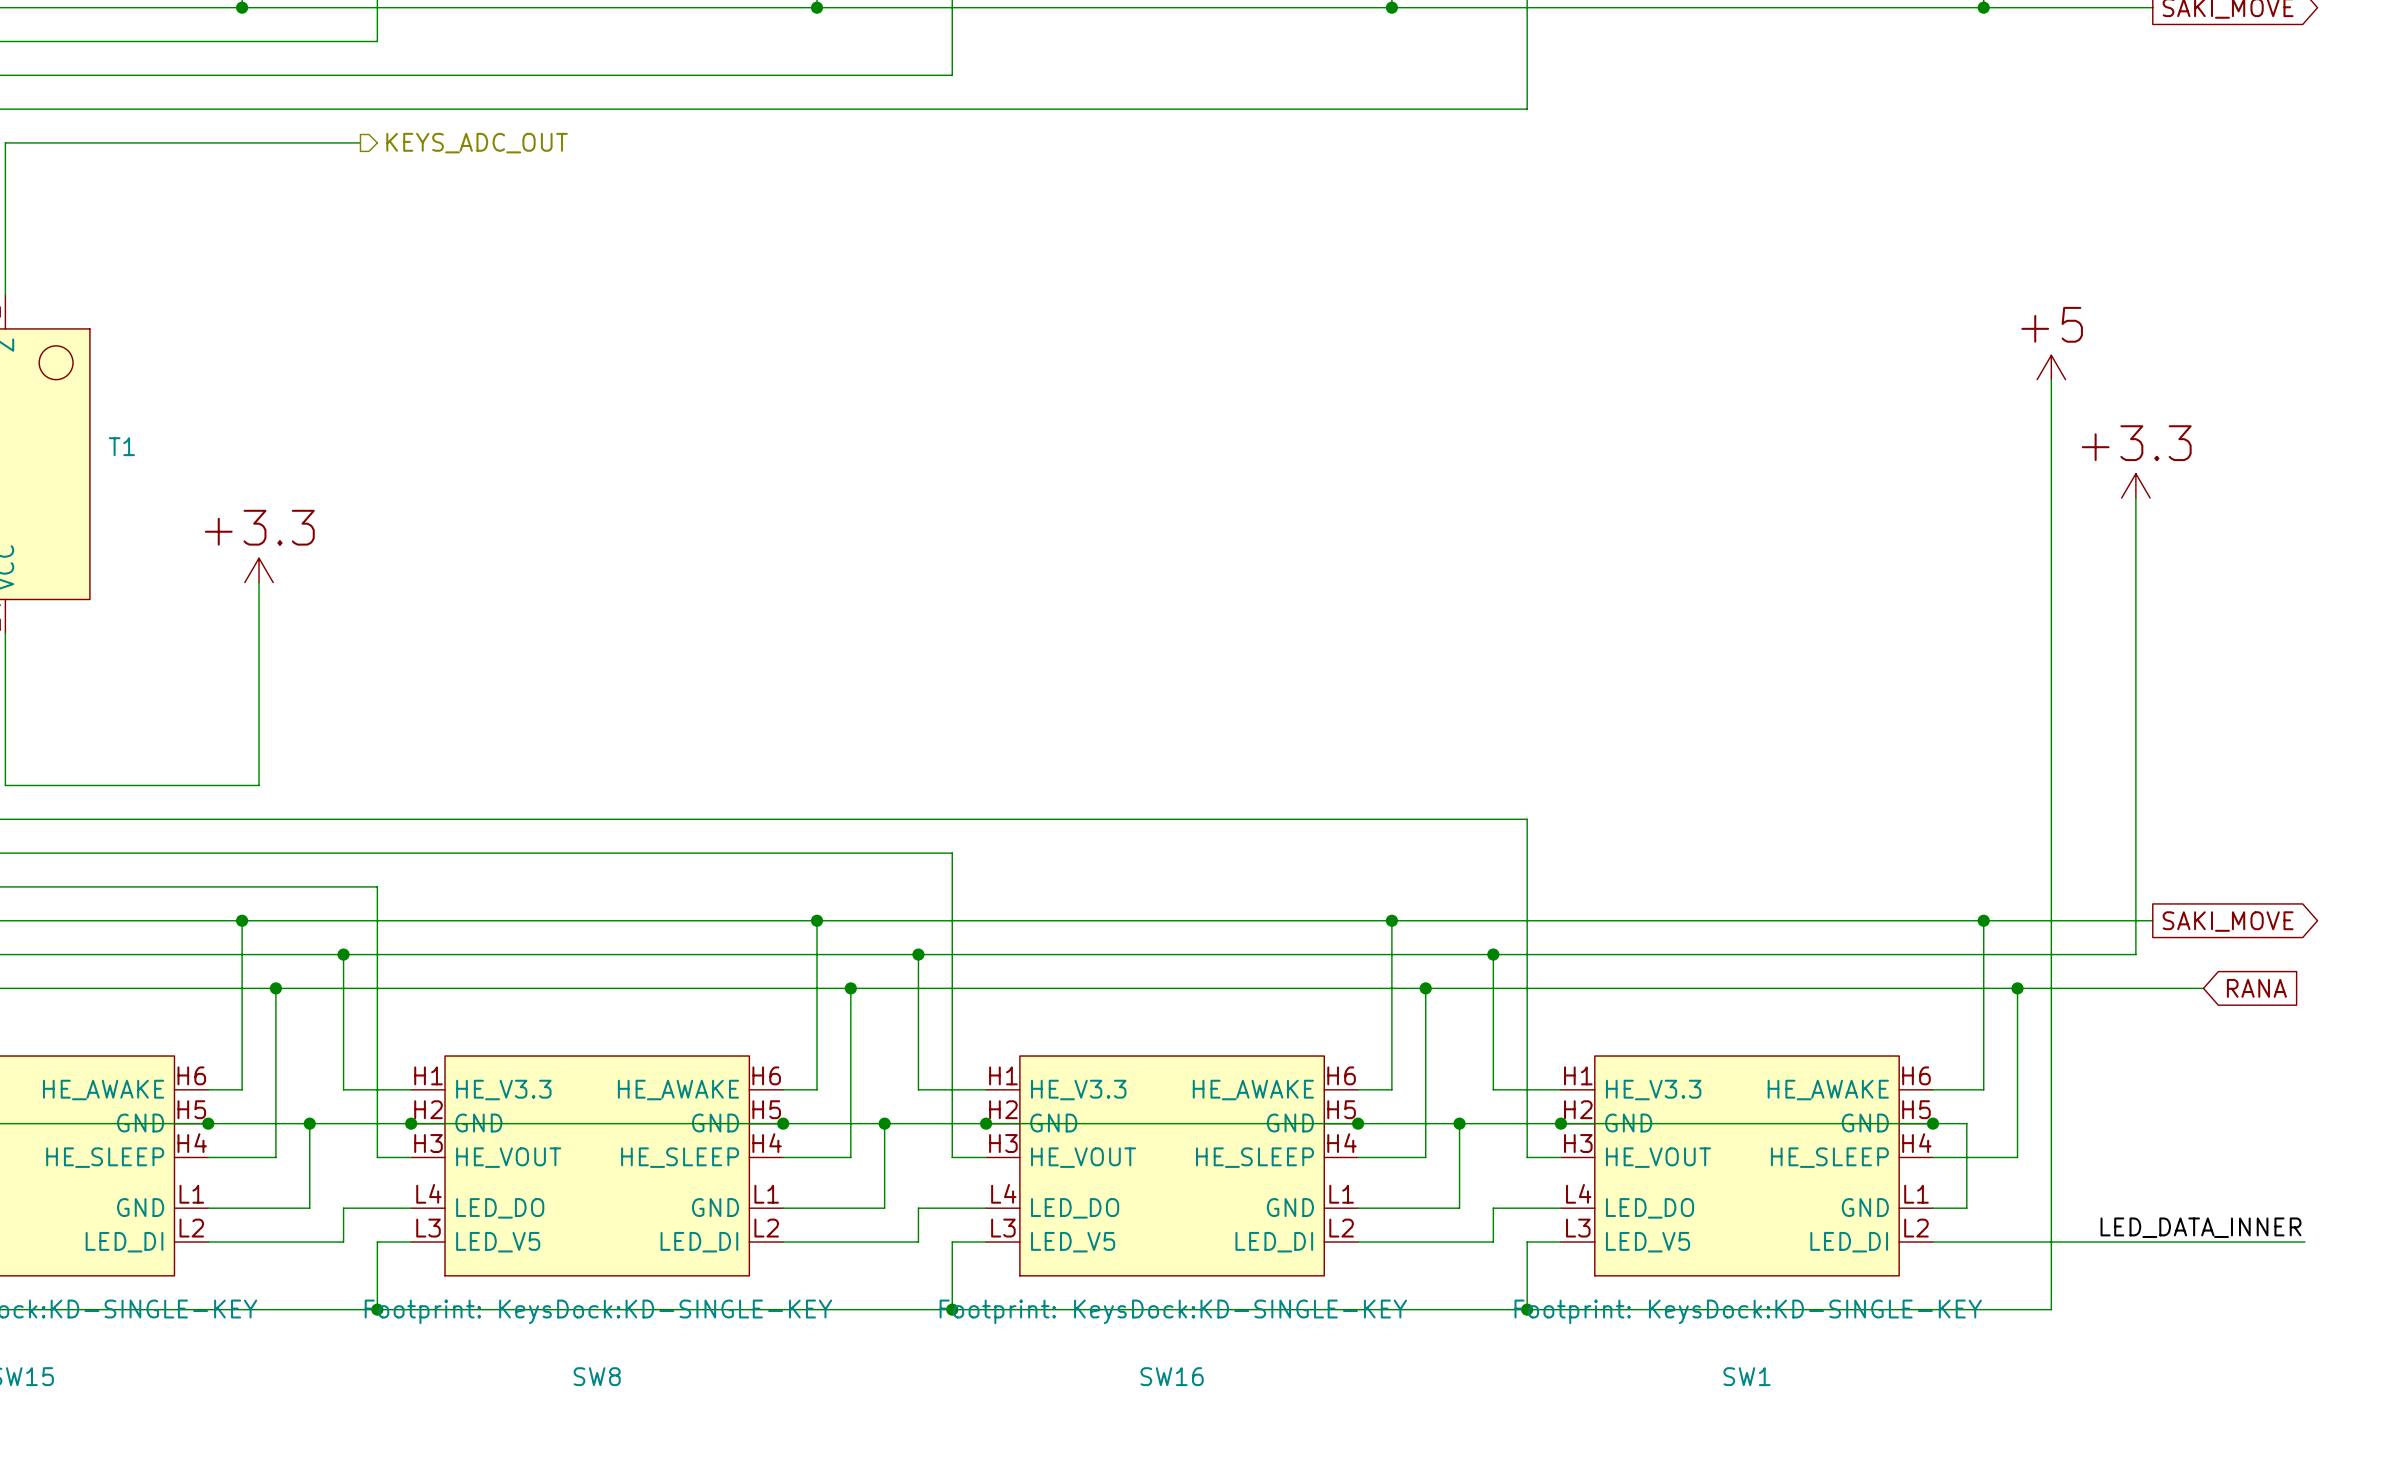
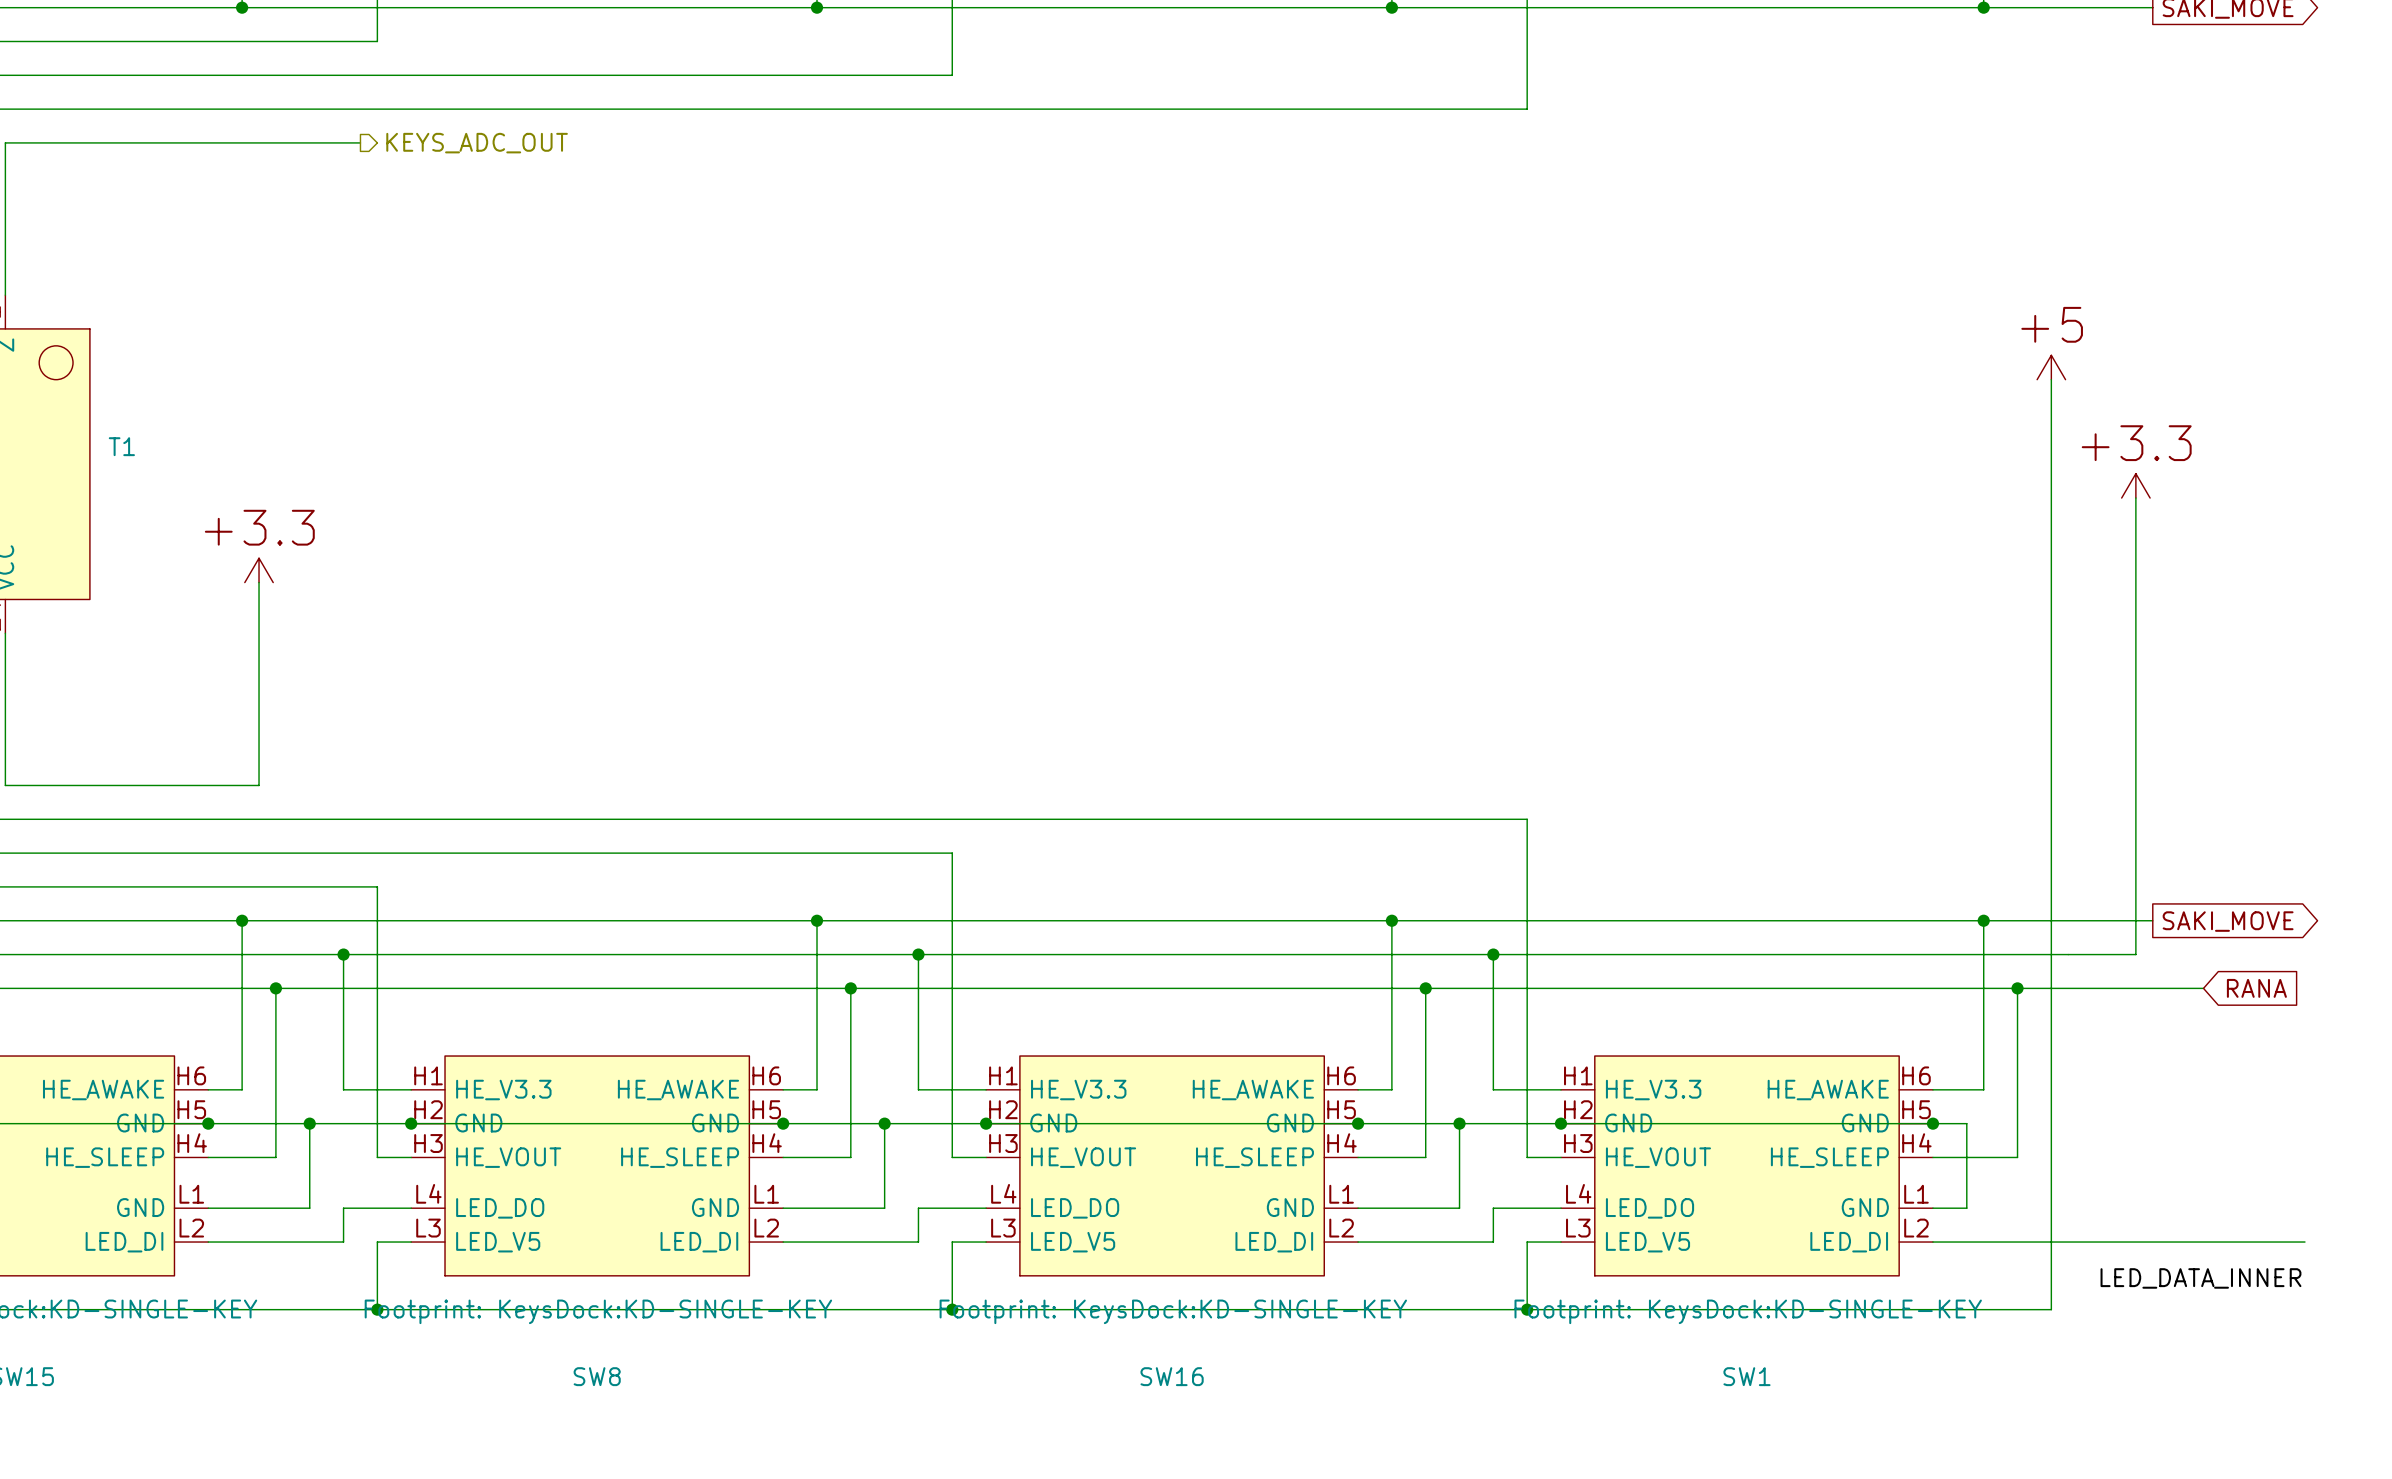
label position: LED_DATA_INNER (2200, 1227) -> LED_DATA_INNER (2200, 1278)

